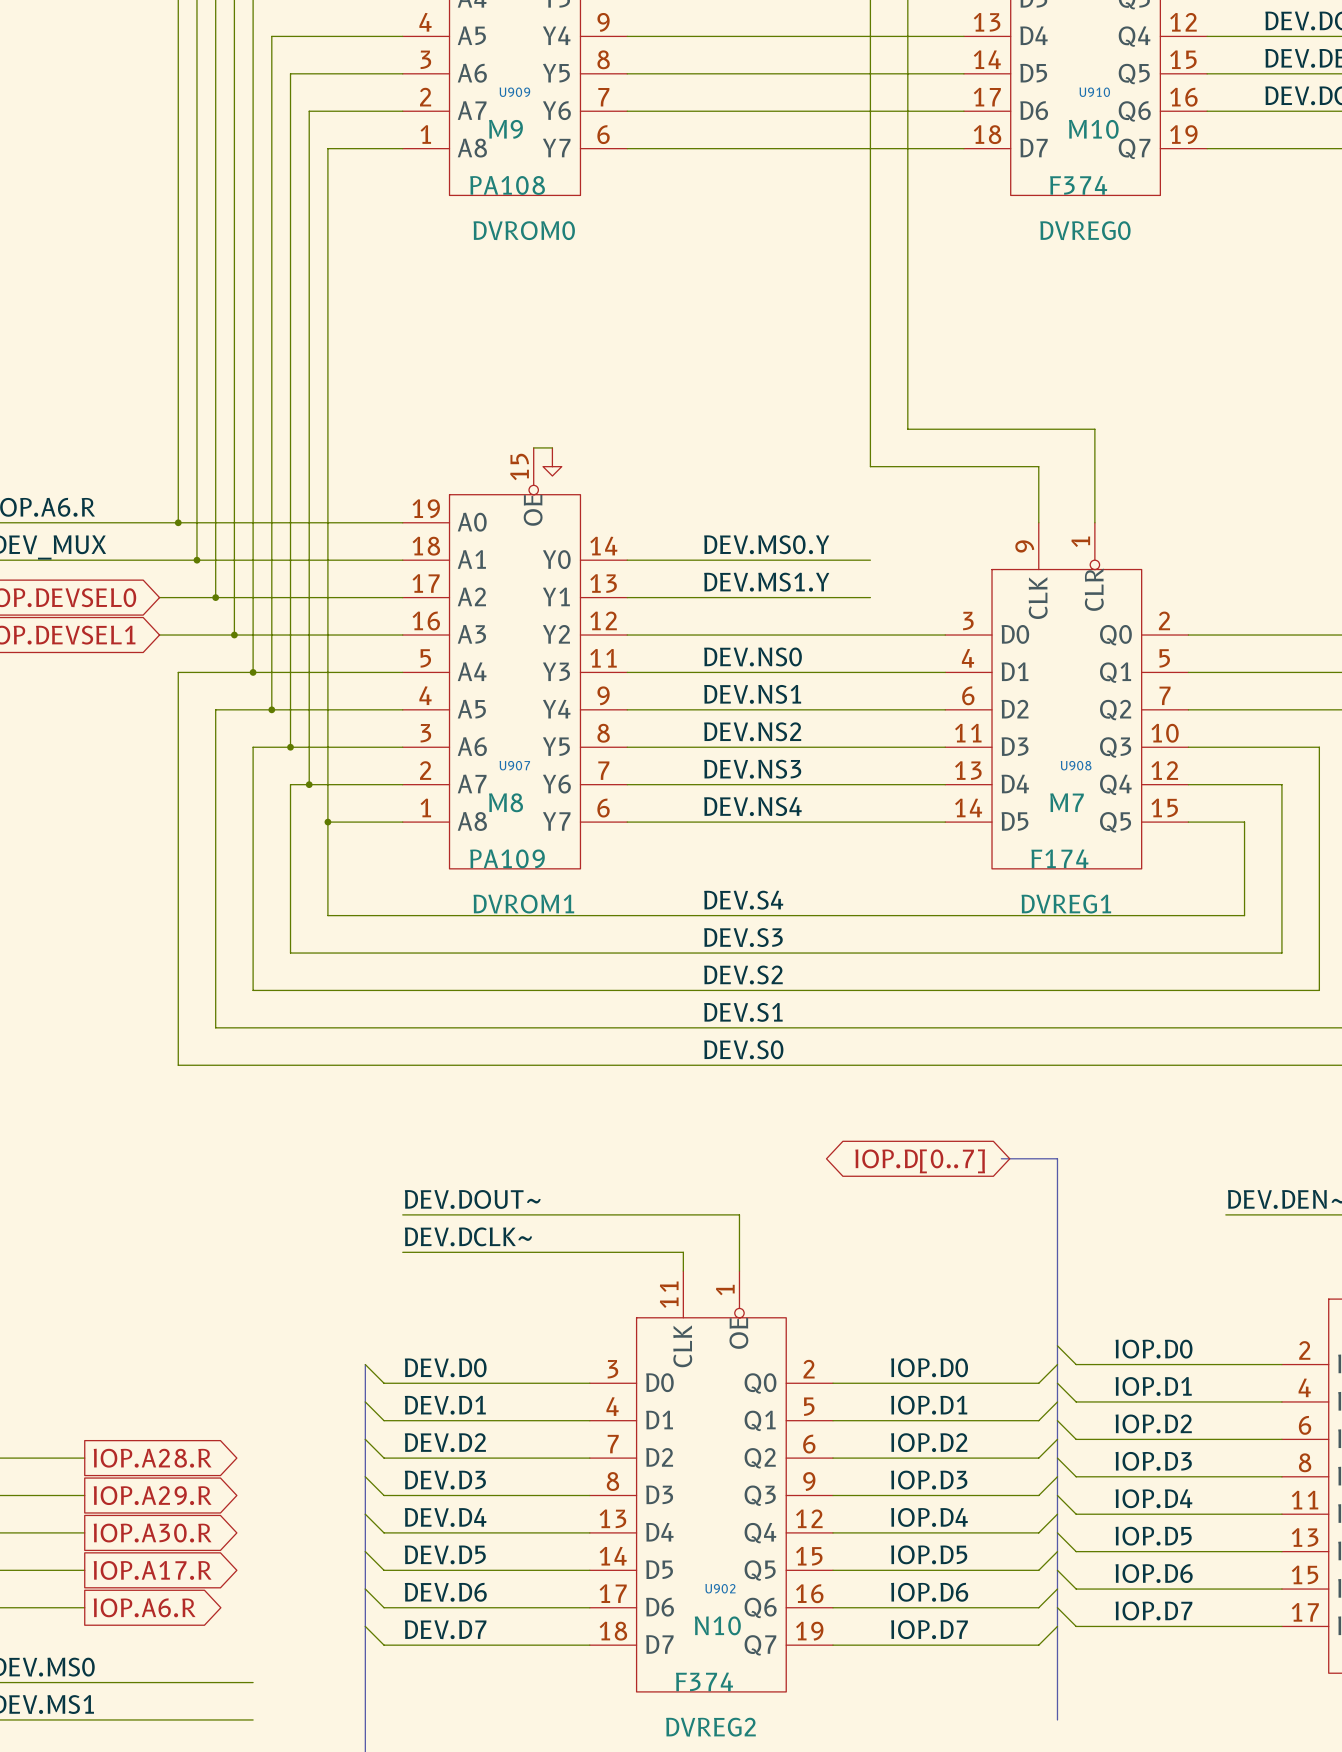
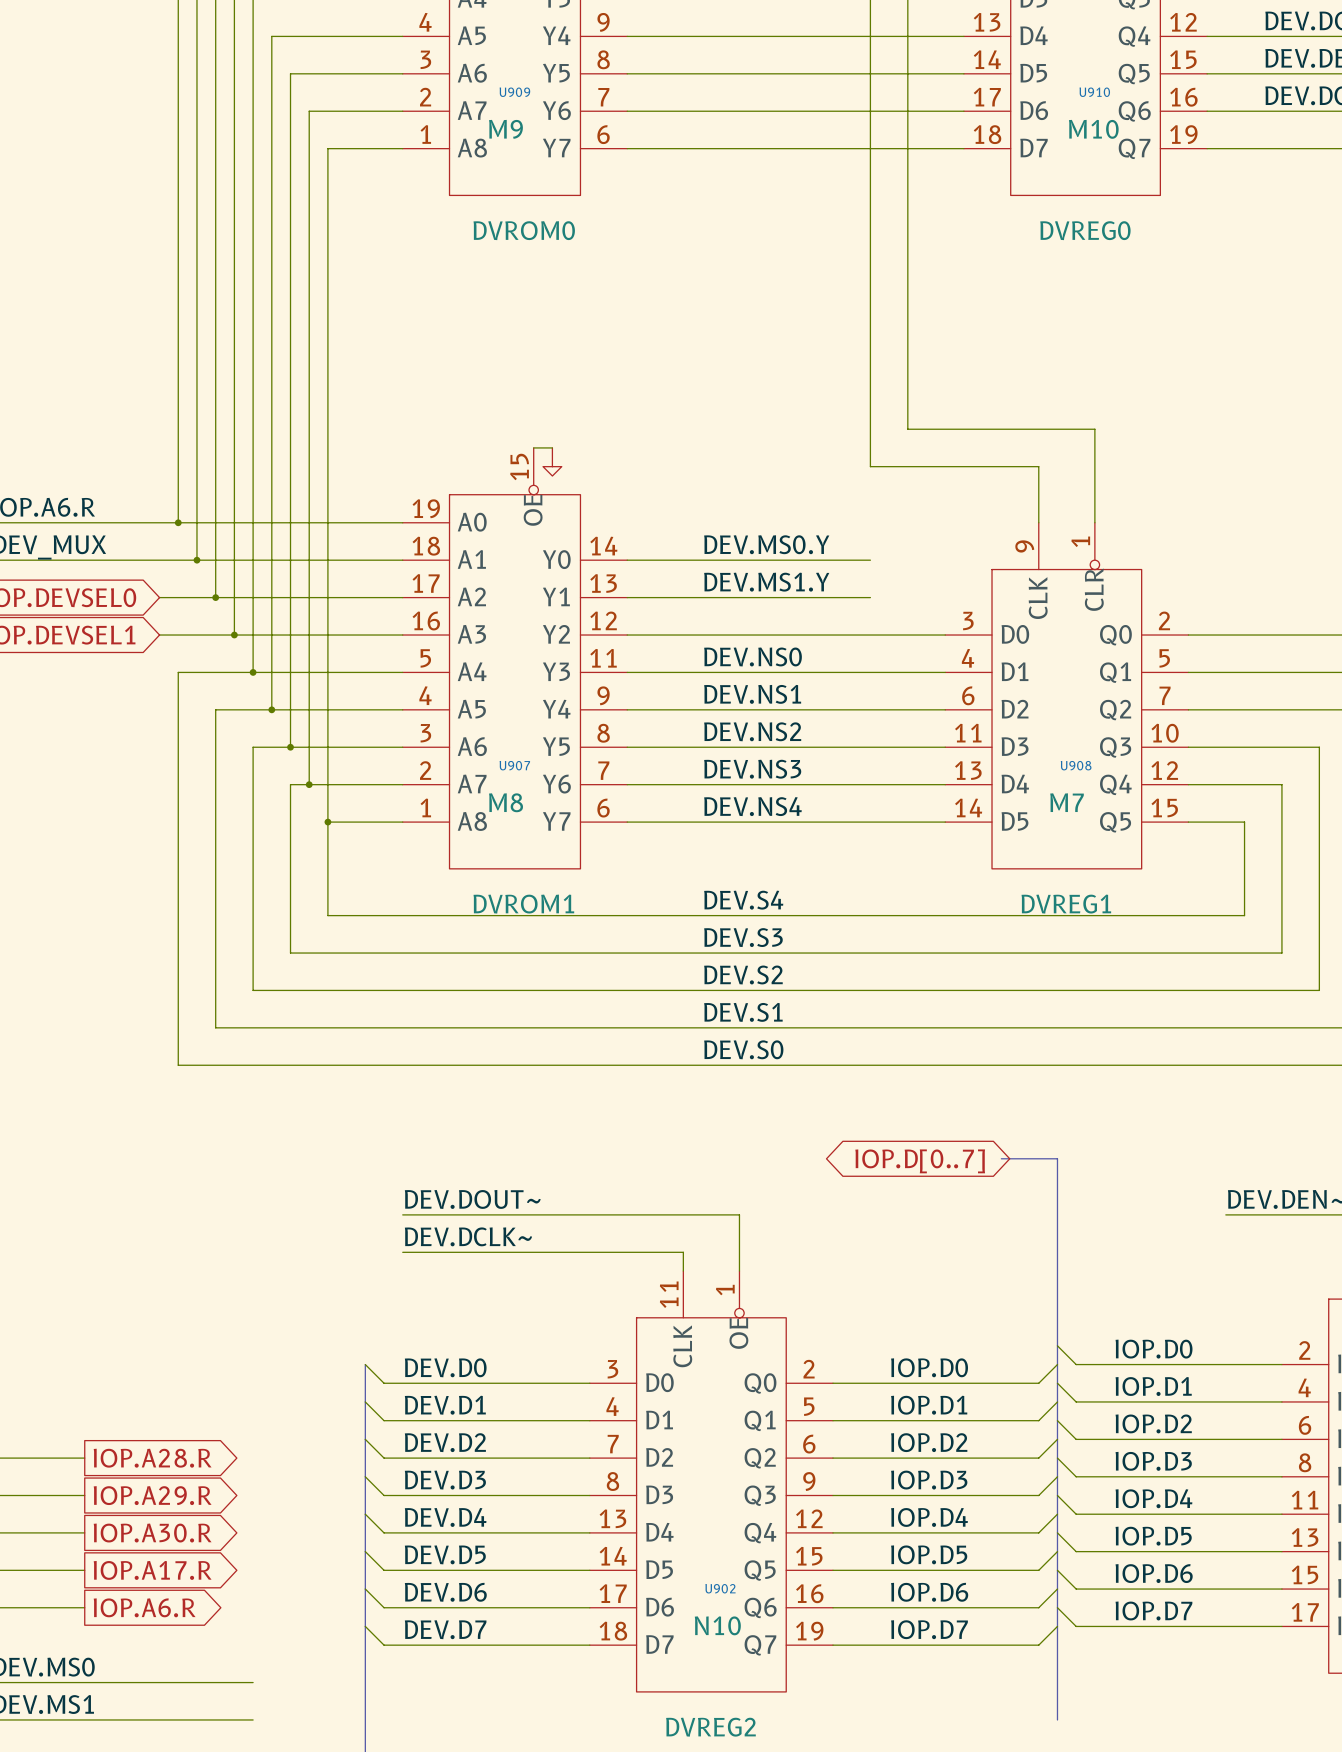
U909 value: PA108 (507, 185) -> none
U910 value: F374 (1078, 185) -> none
U907 value: PA109 (507, 858) -> none
U908 value: F174 (1059, 858) -> none
U902 value: F374 (704, 1681) -> none

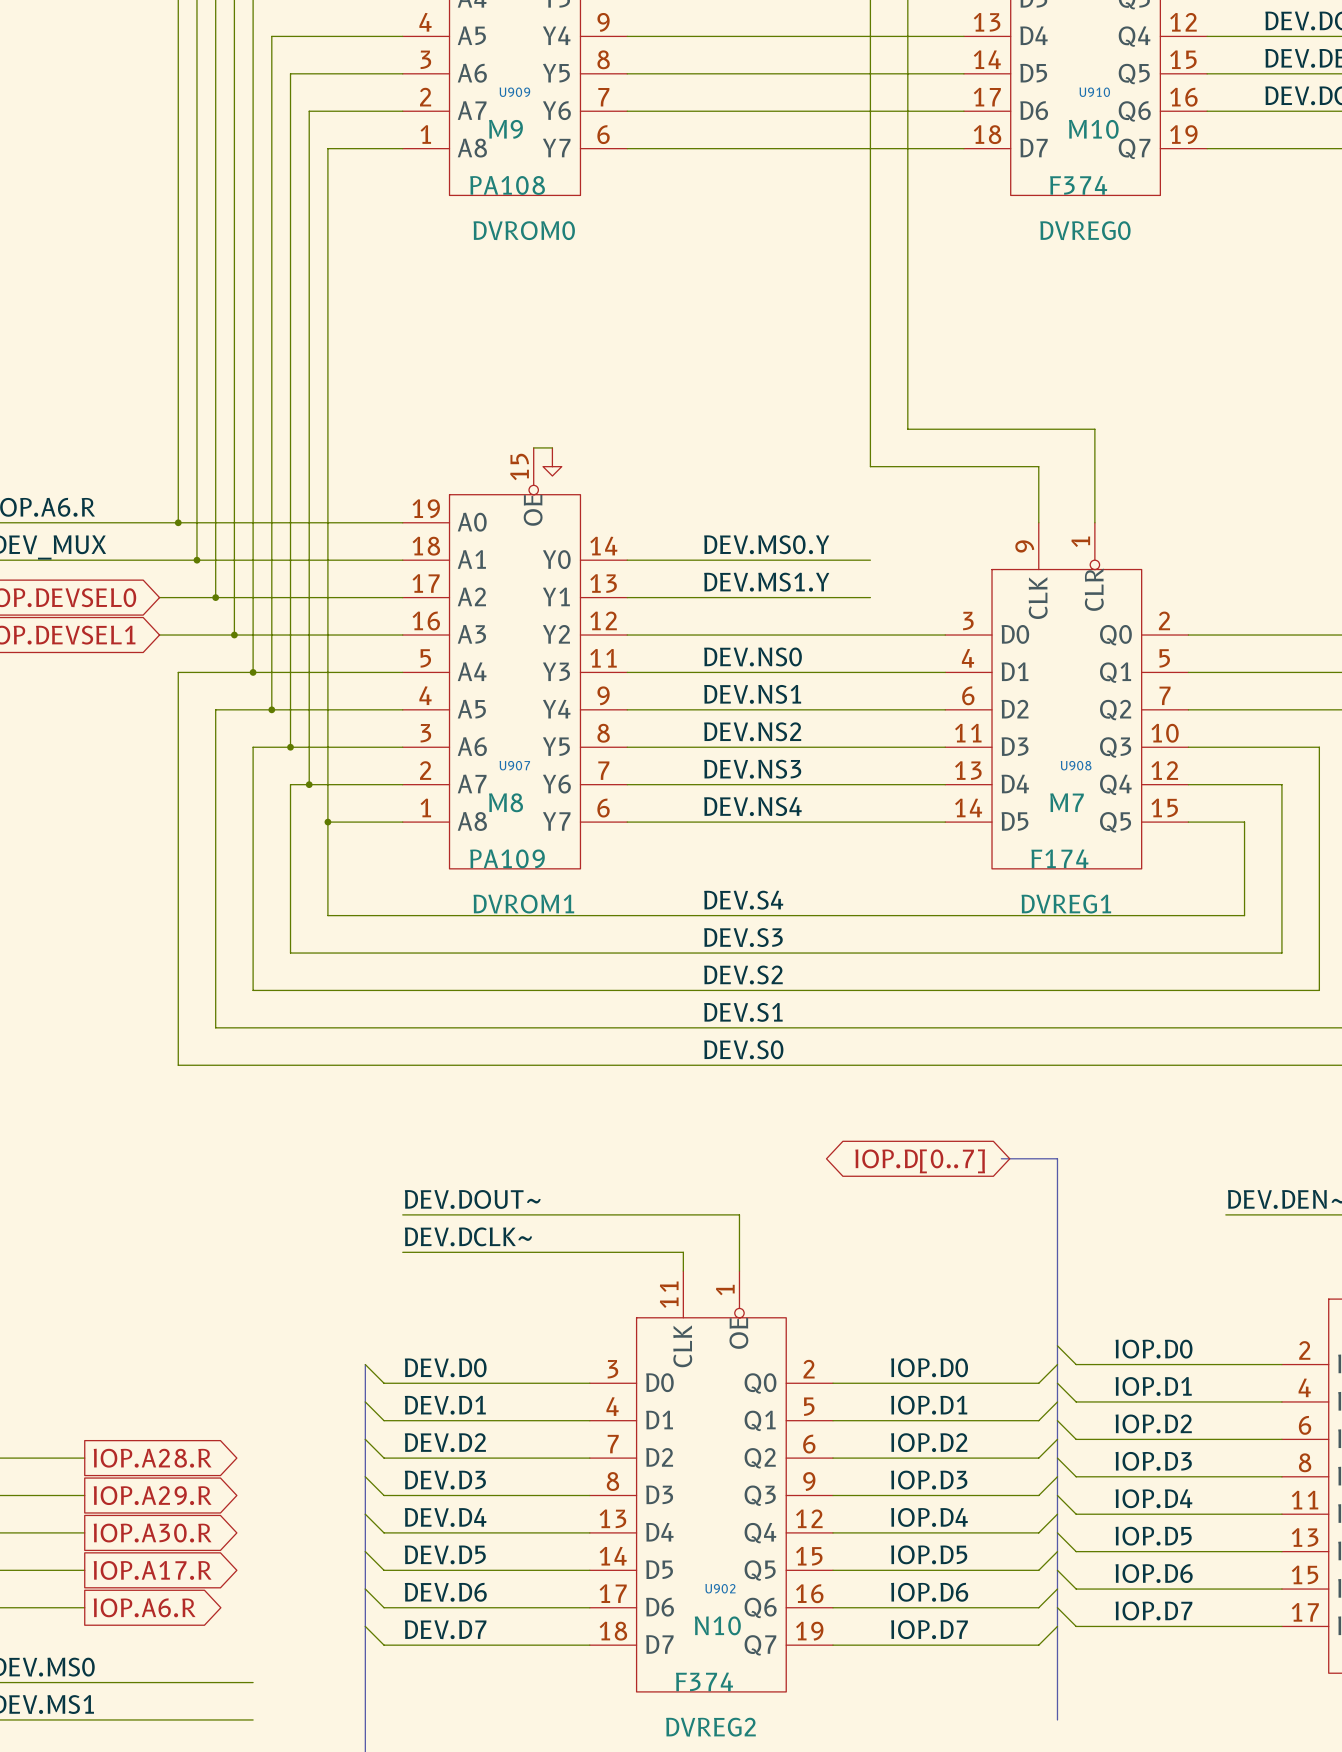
U909 value: none -> PA108 (507, 185)
U910 value: none -> F374 (1078, 185)
U907 value: none -> PA109 (507, 858)
U908 value: none -> F174 (1059, 858)
U902 value: none -> F374 (704, 1681)

